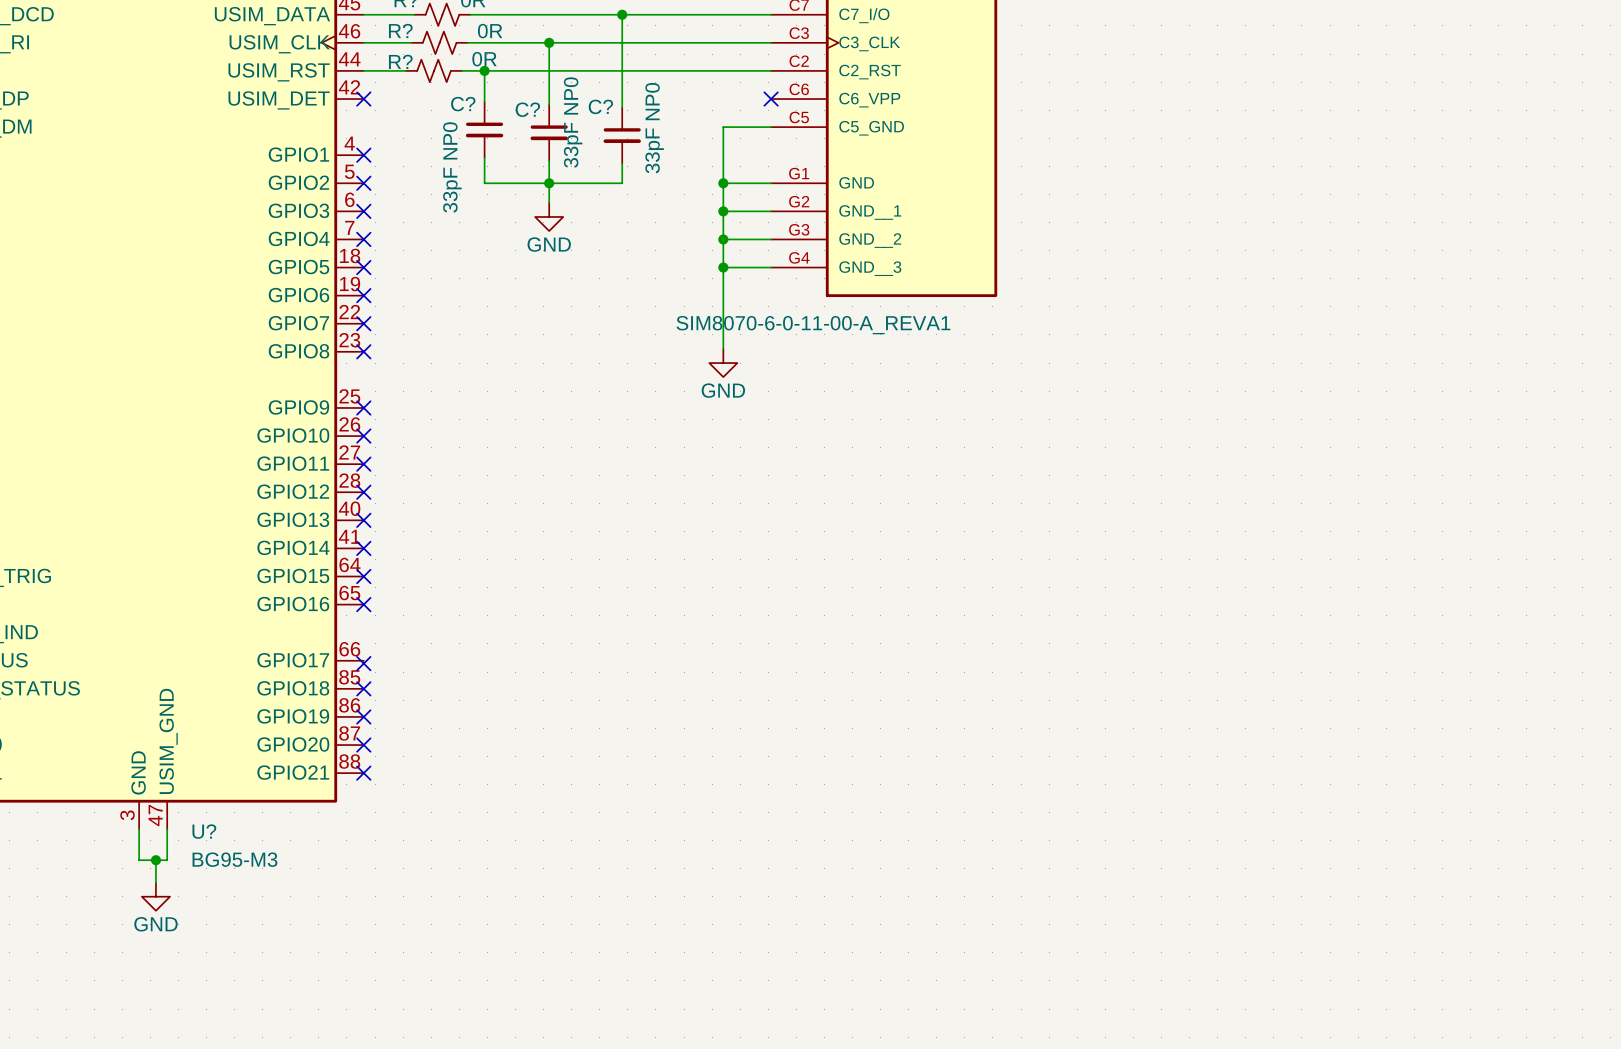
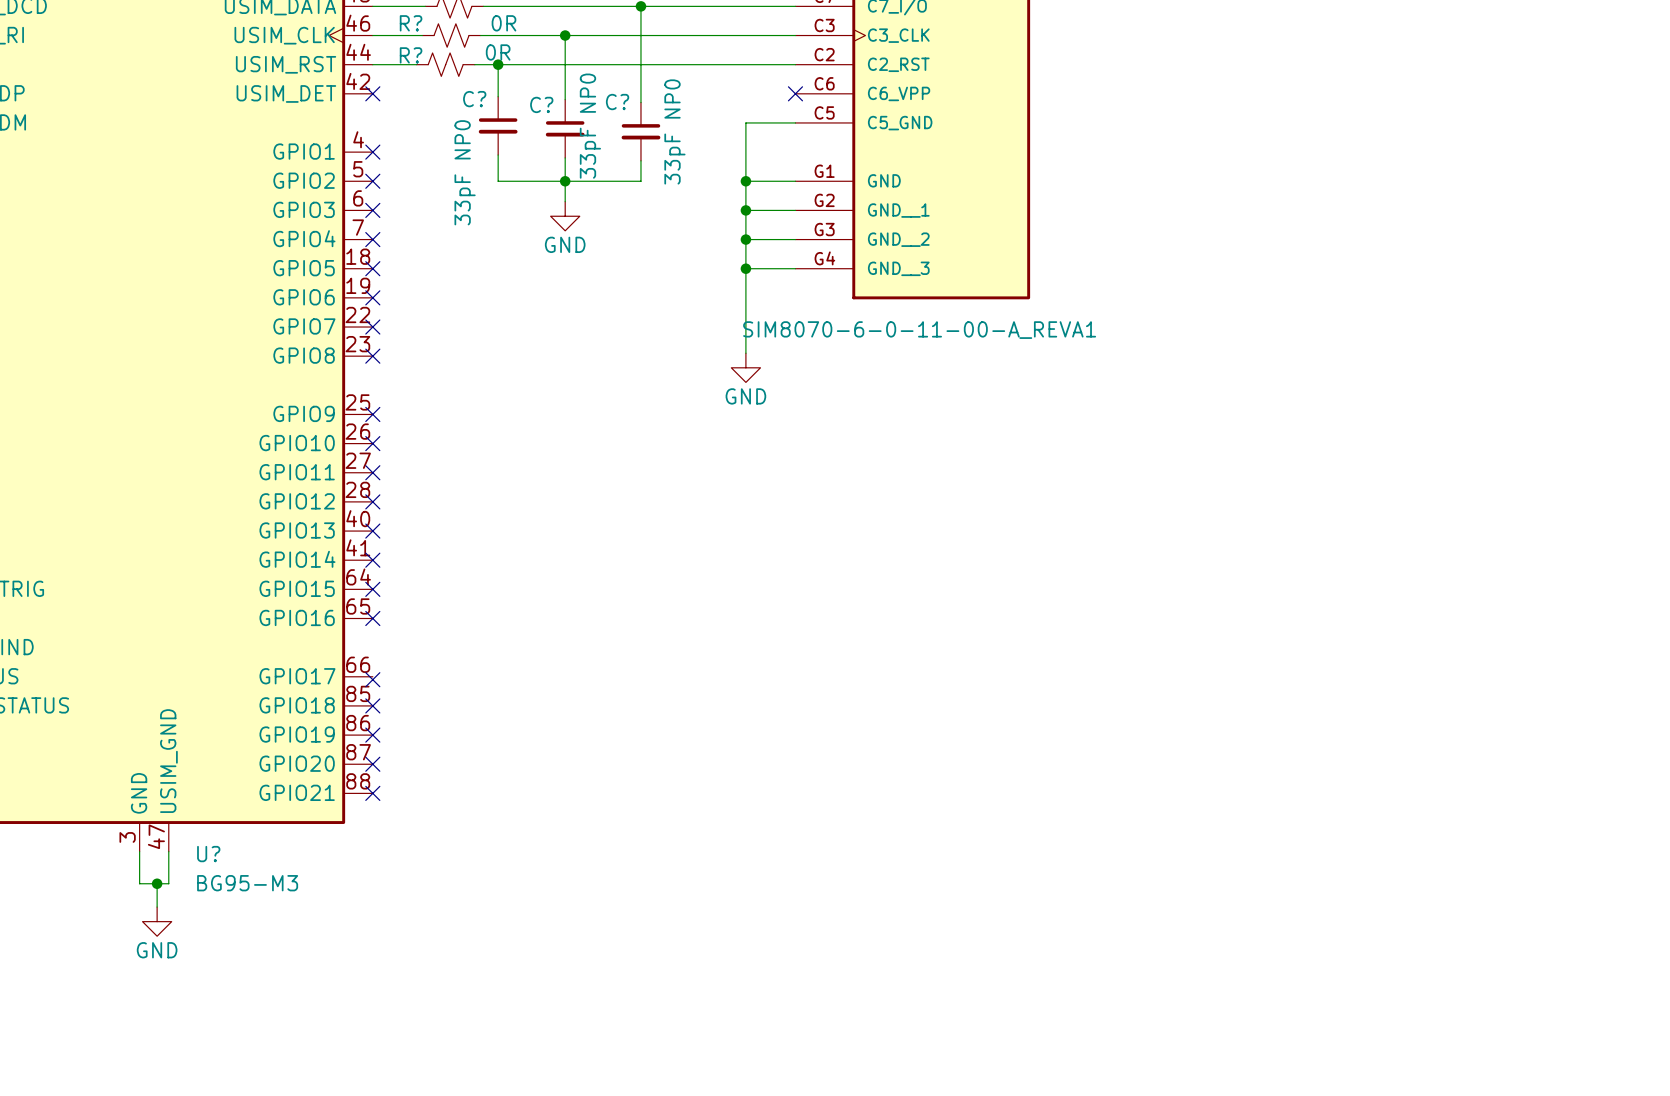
part value position: SIM8070-6-0-11-00-A_REVA1 (813, 325) -> SIM8070-6-0-11-00-A_REVA1 (919, 330)

